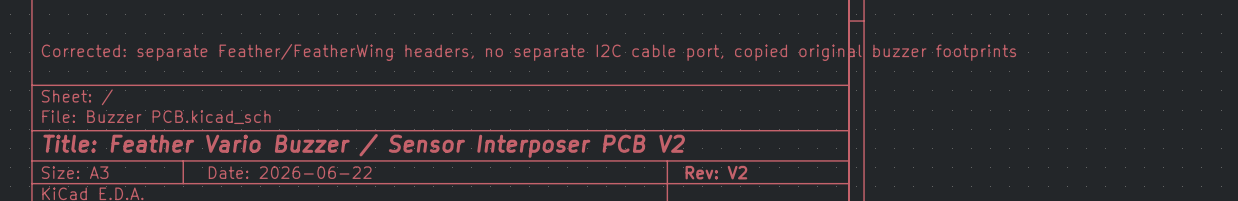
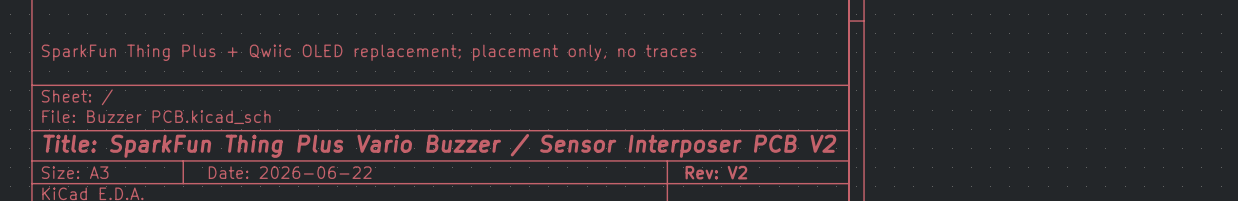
title block: Corrected: separate Feather/FeatherWing headers, no separate I2C cable port, copied original buzzer footprints (528, 52) -> SparkFun Thing Plus + Qwiic OLED replacement; placement only, no traces (369, 52)
title block: Title: Feather Vario Buzzer / Sensor Interposer PCB V2 (364, 145) -> Title: SparkFun Thing Plus Vario Buzzer / Sensor Interposer PCB V2 (439, 145)

